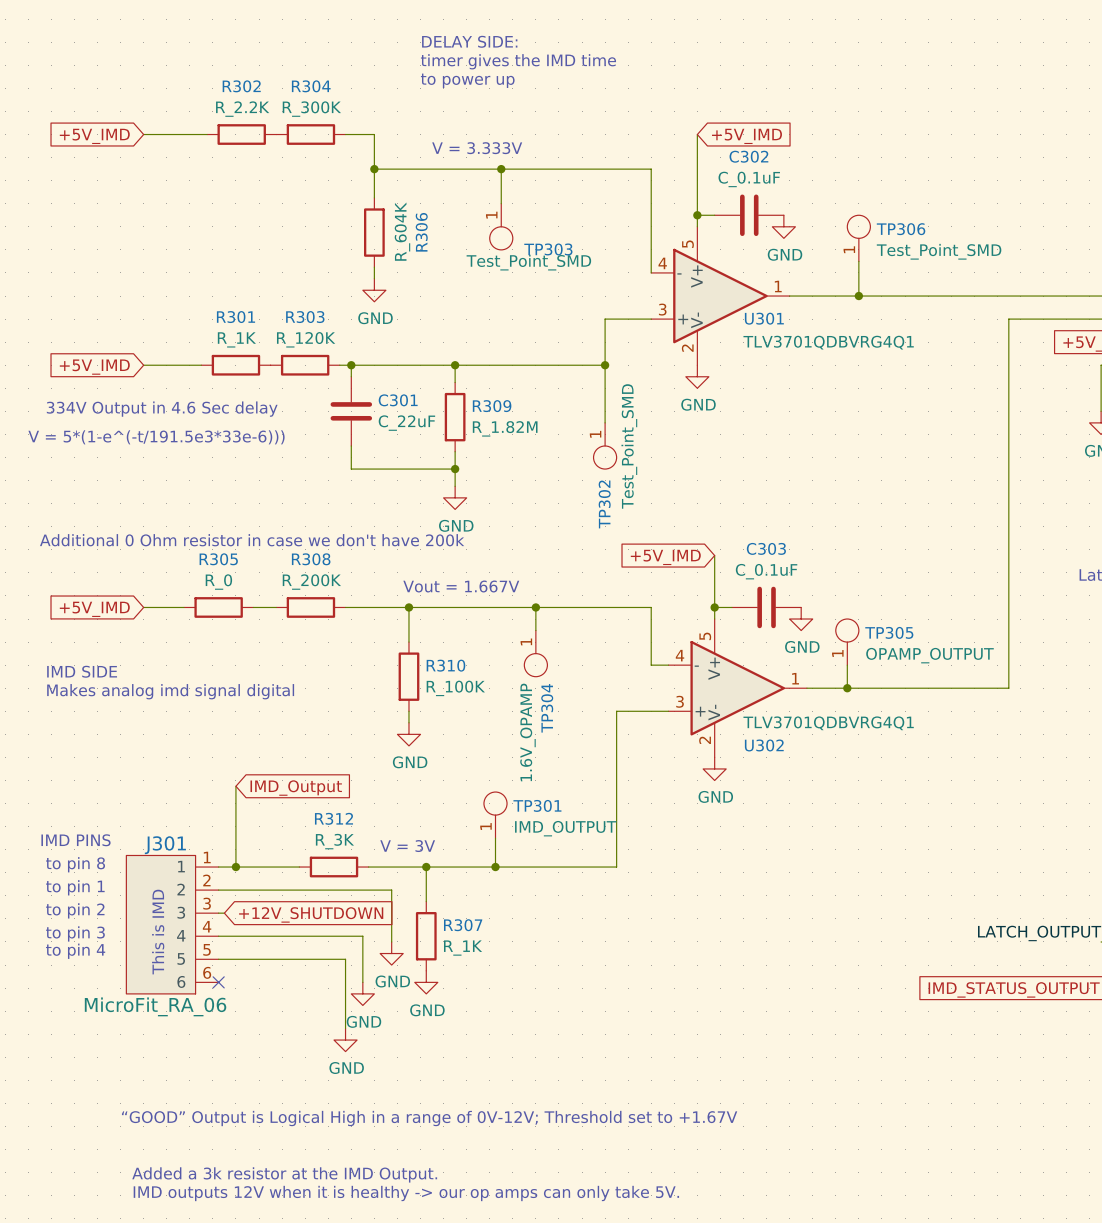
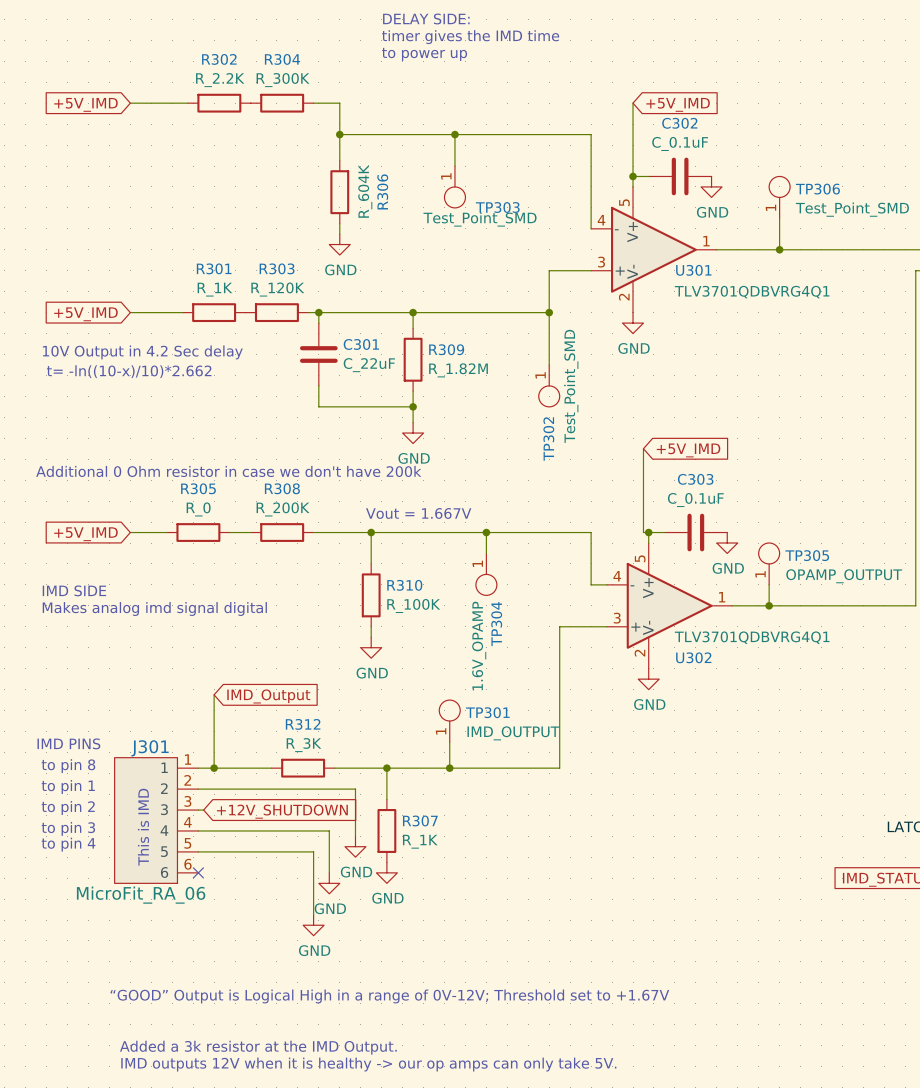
text: V = 3.333V (477, 148) -> none
text: 334V Output in 4.6 Sec delay (162, 409) -> 10V Output in 4.2 Sec delay (142, 352)
text: none -> t= -ln((10-x)/10)*2.662 (129, 371)
text: V = 5*(1-e^(-t/191.5e3*33e-6))) (156, 437) -> none
wire: (714, 555) (714, 607) -> (643, 448) (643, 532) (648, 532)
global label rotation: 0° (665, 557) -> 180° (688, 450)
global label position: +5V_IMD (665, 557) -> +5V_IMD (688, 450)
text: V = 3V (407, 846) -> none

